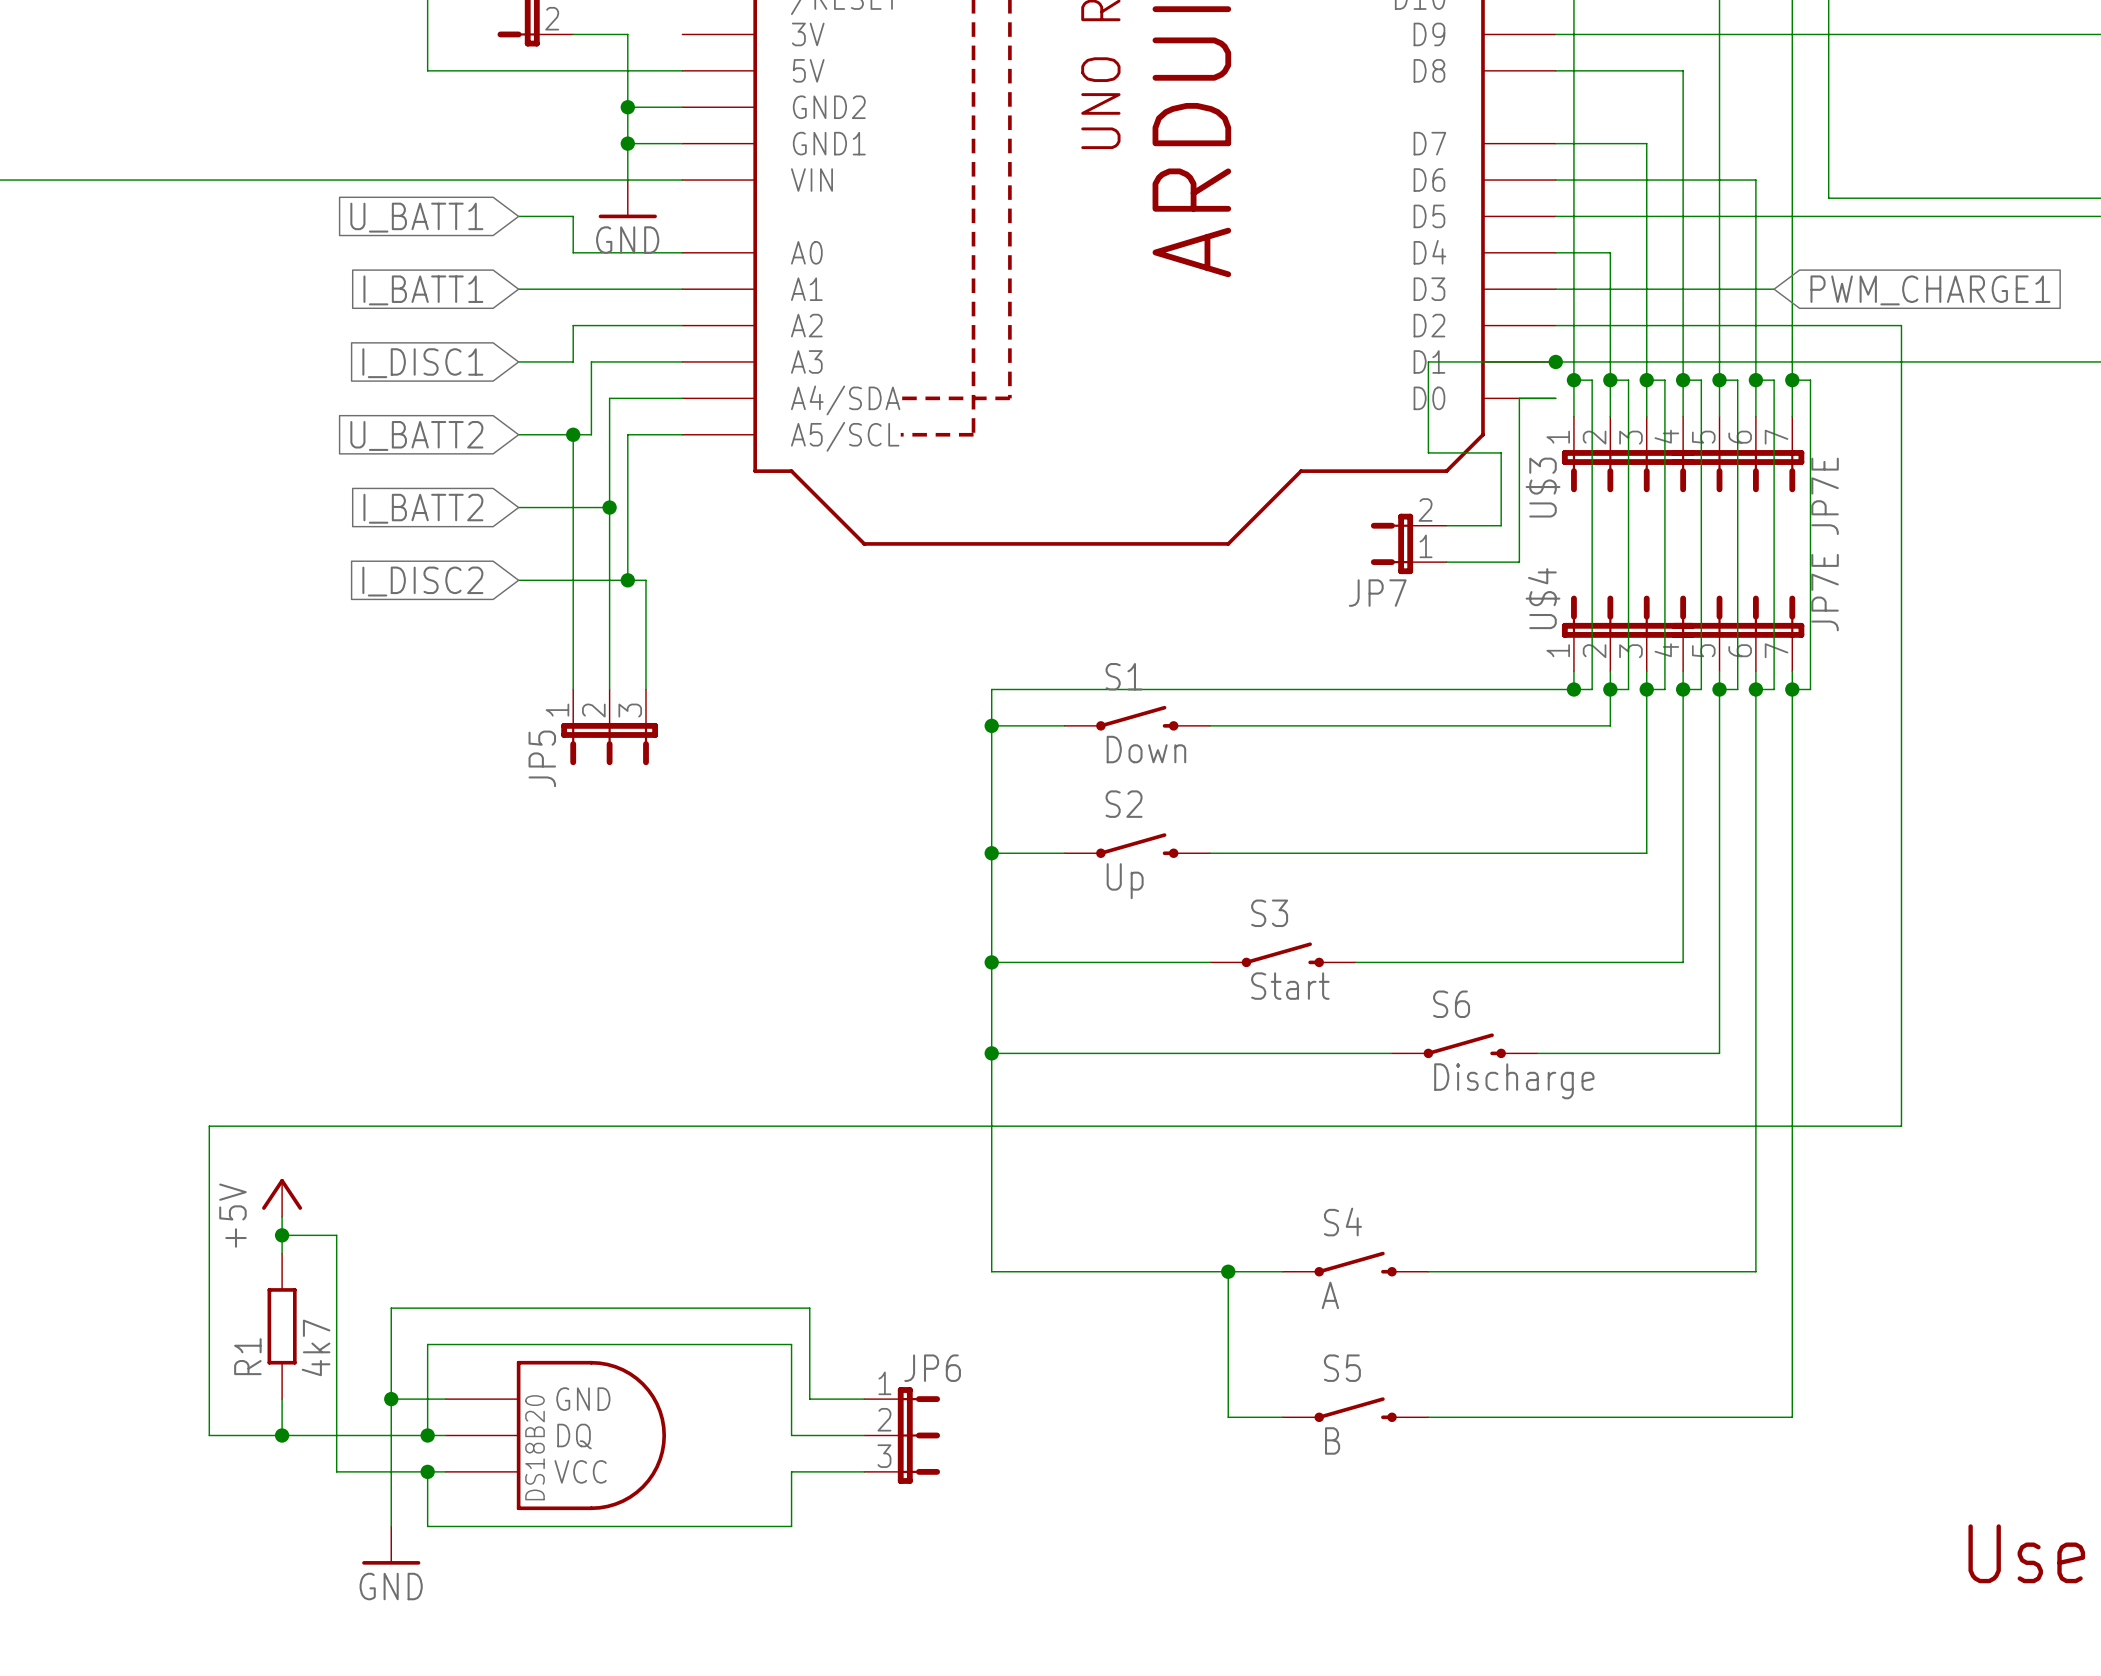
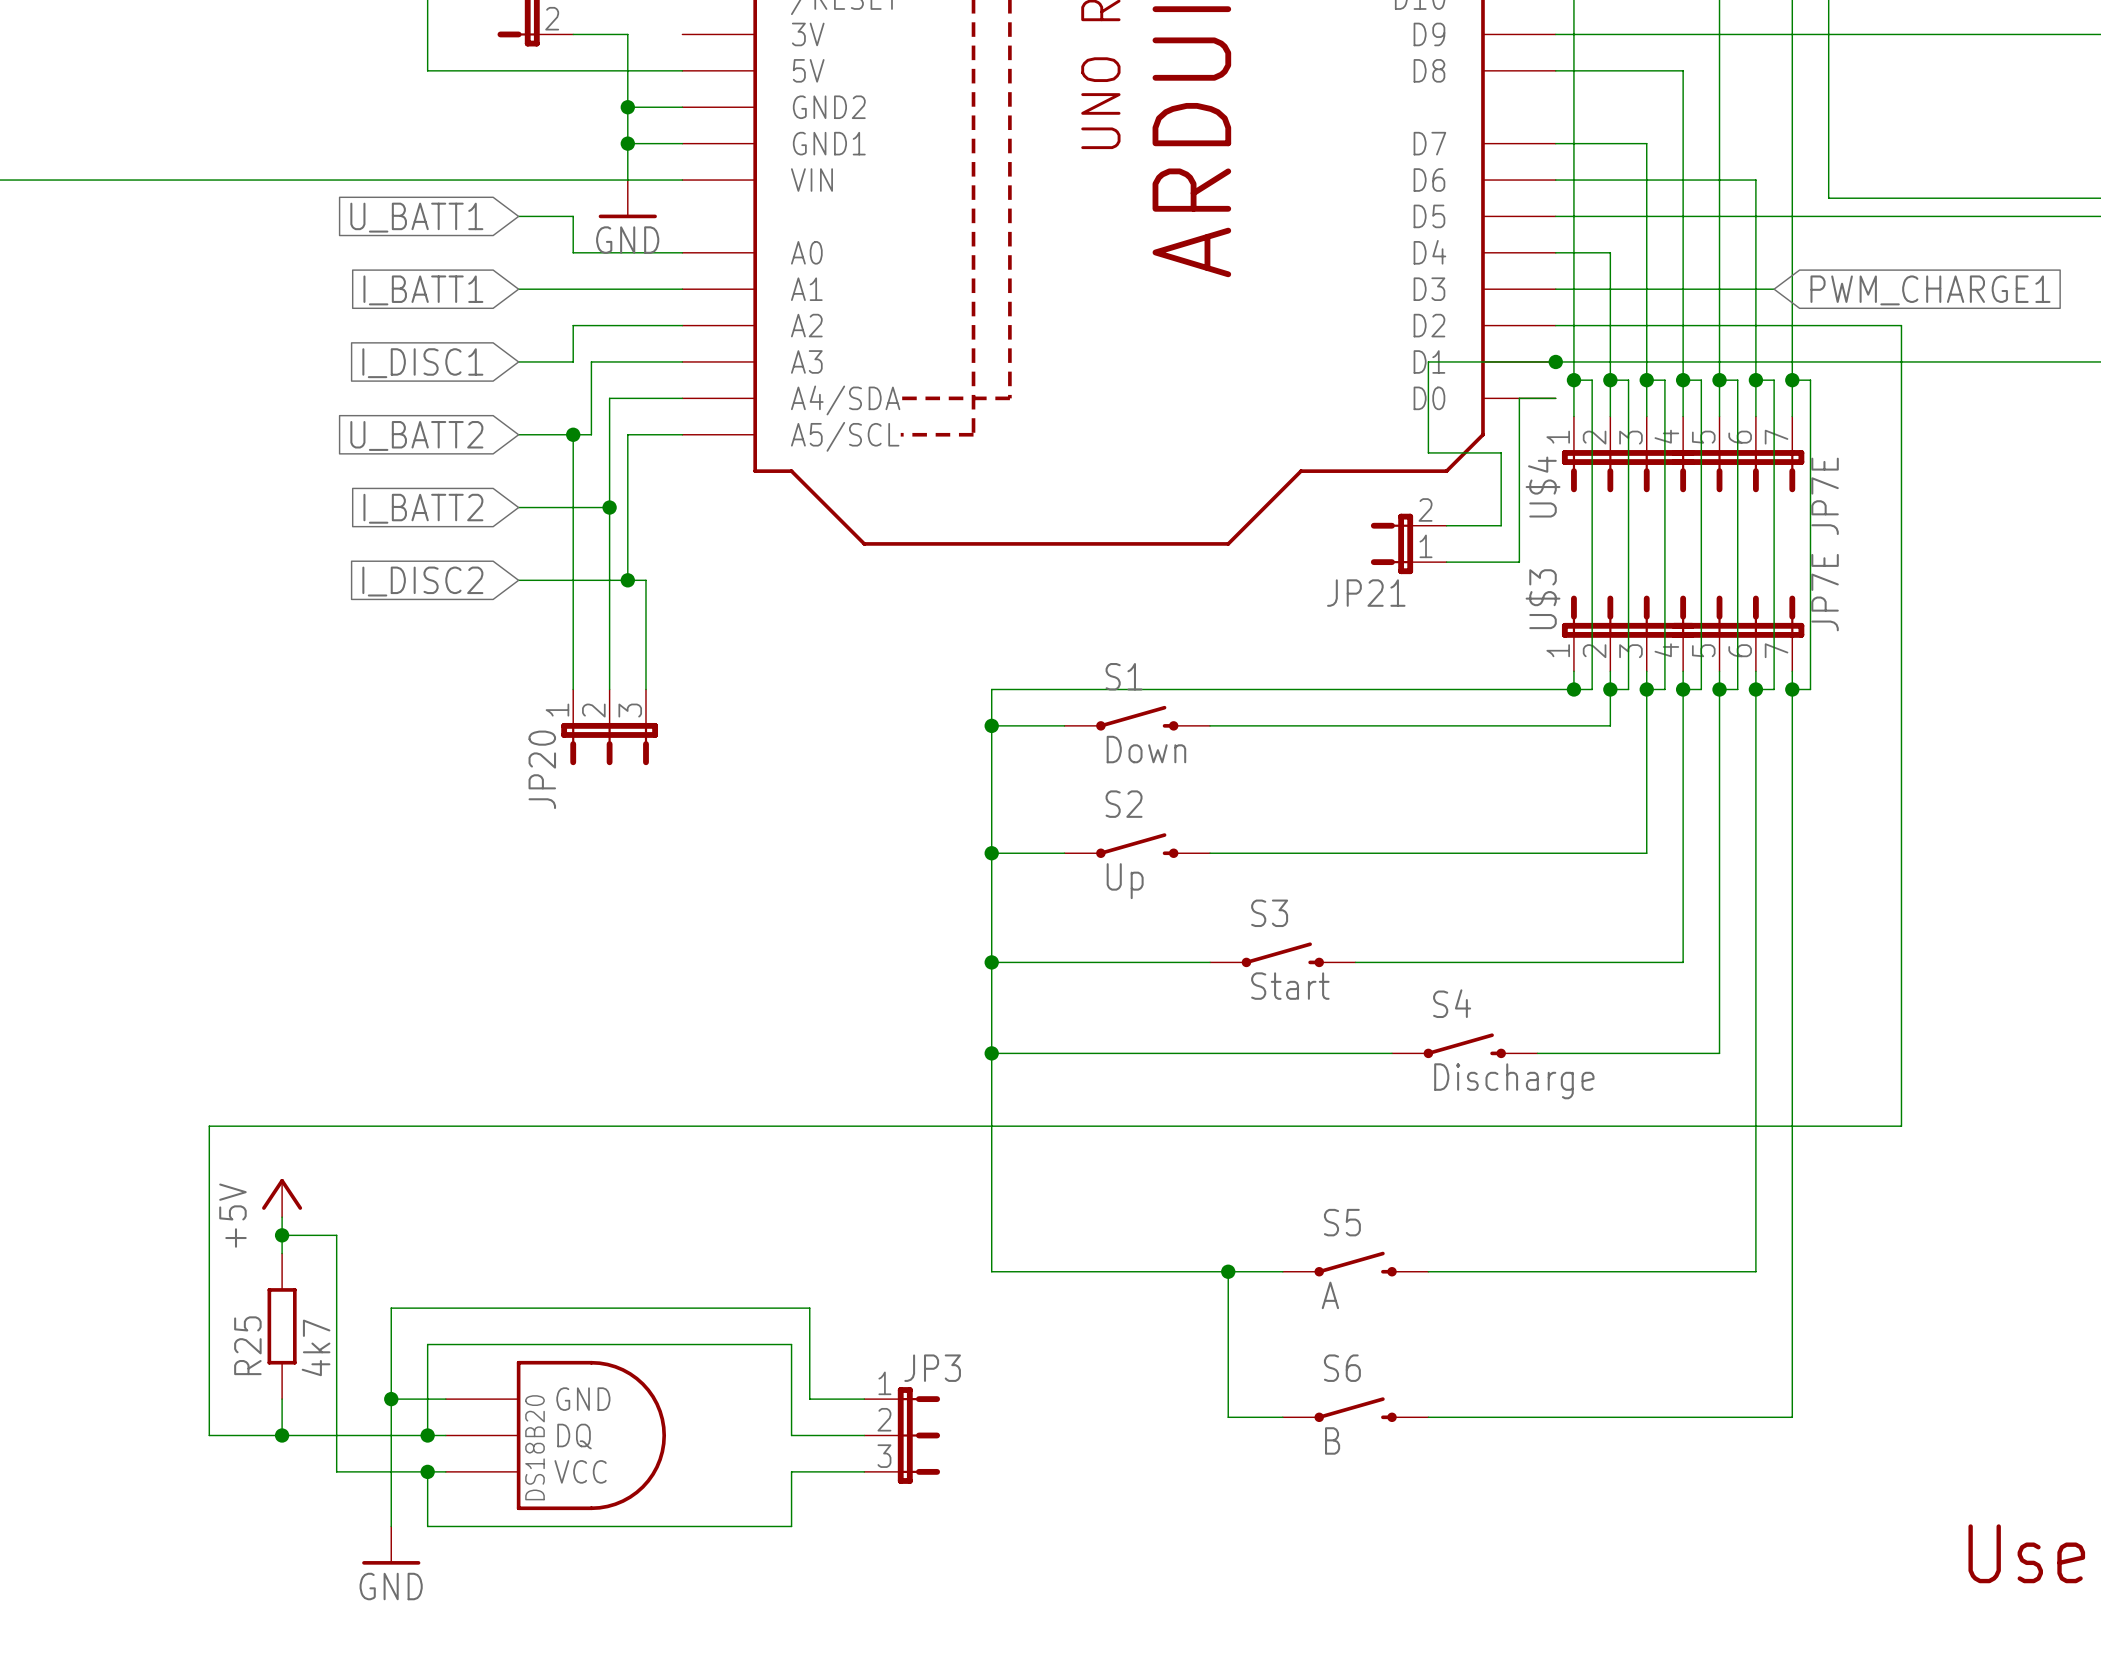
U$3 name: U$3 (1543, 487) -> U$4 (1543, 487)
JP7 name: JP7 (1377, 593) -> JP21 (1366, 593)
U$4 name: U$4 (1543, 598) -> U$3 (1543, 599)
JP5 name: JP5 (542, 758) -> JP20 (542, 769)
S6 name: S6 (1451, 1004) -> S4 (1452, 1003)
S4 name: S4 (1342, 1222) -> S5 (1342, 1222)
R1 name: R1 (247, 1356) -> R25 (247, 1345)
JP6 name: JP6 (932, 1368) -> JP3 (932, 1368)
S5 name: S5 (1342, 1368) -> S6 (1342, 1368)

